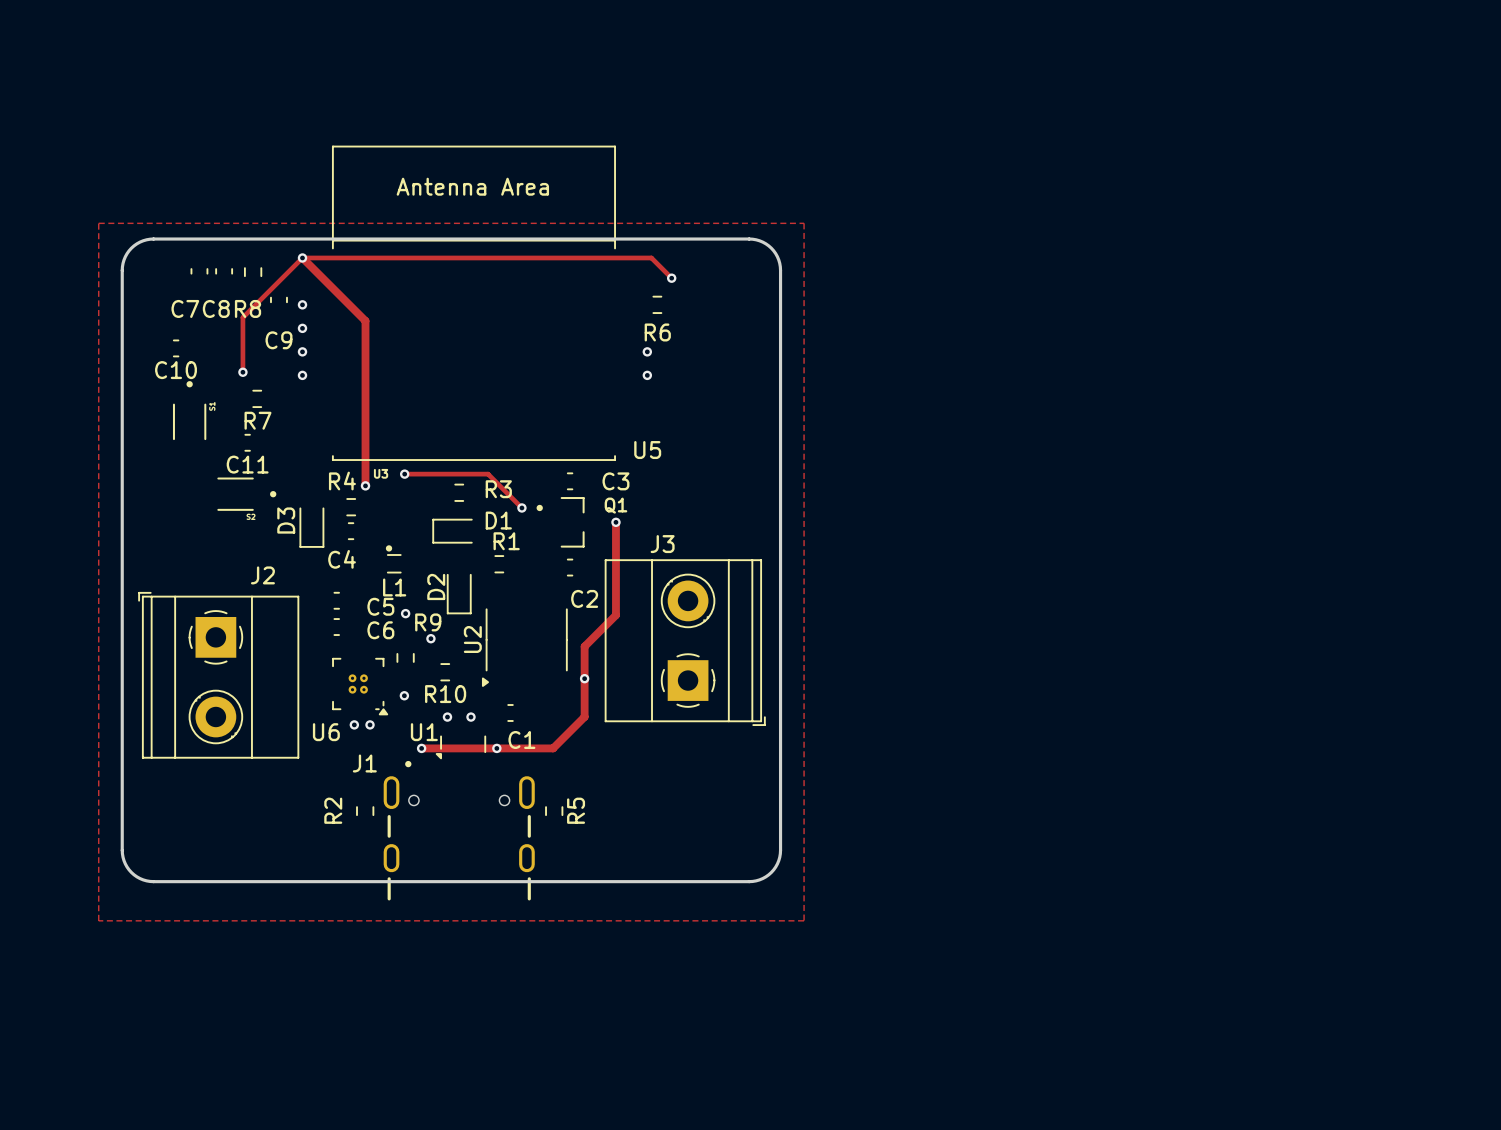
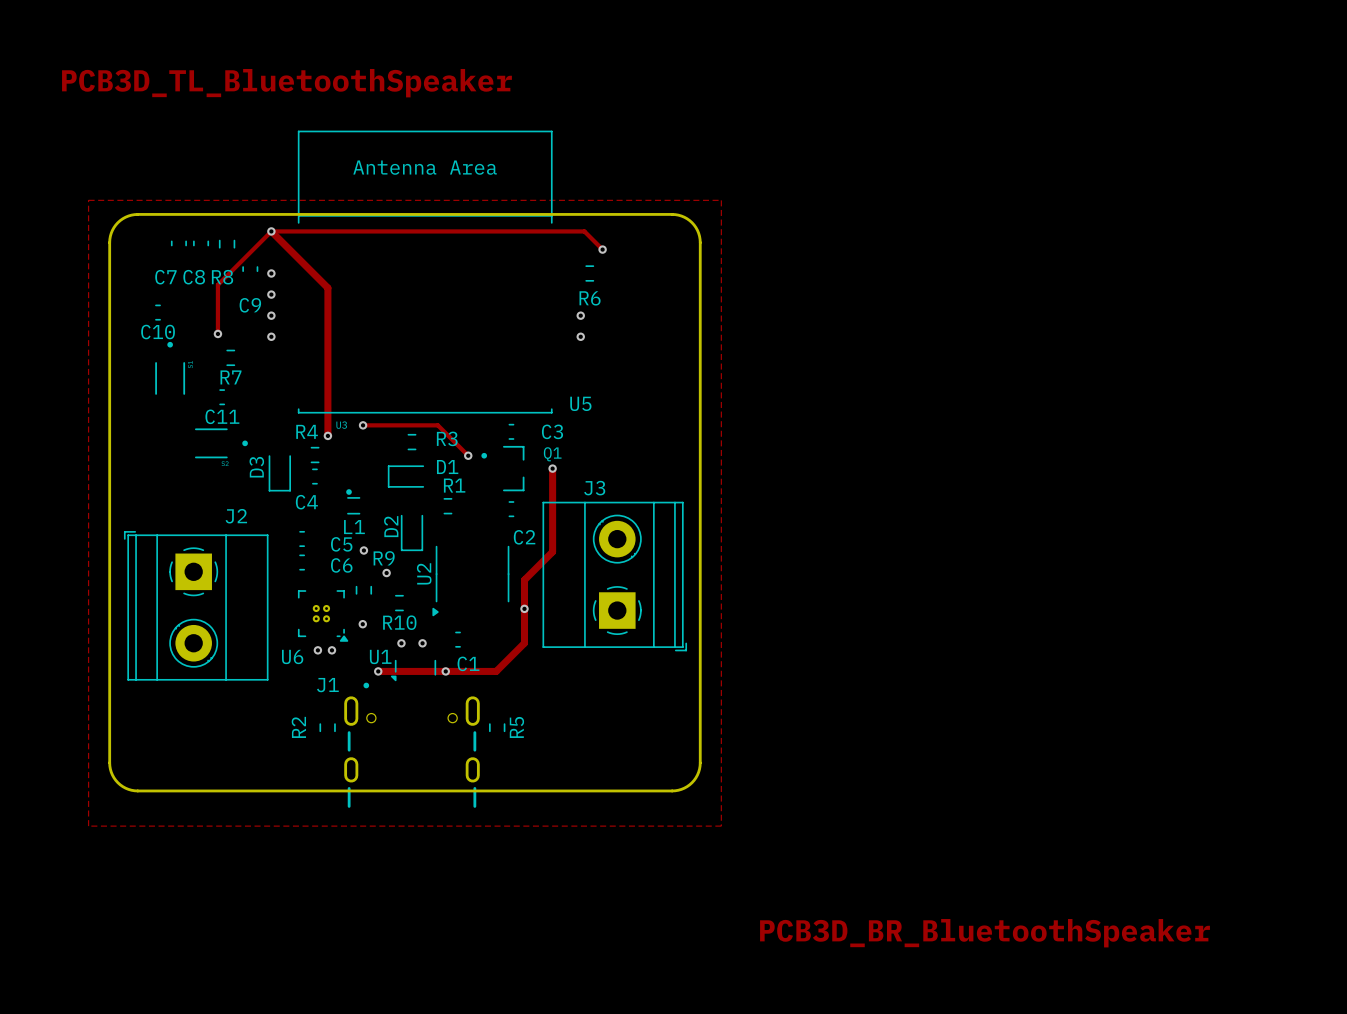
text: none -> PCB3D_TL_BluetoothSpeaker (286, 83)
text: none -> PCB3D_BR_BluetoothSpeaker (985, 933)

